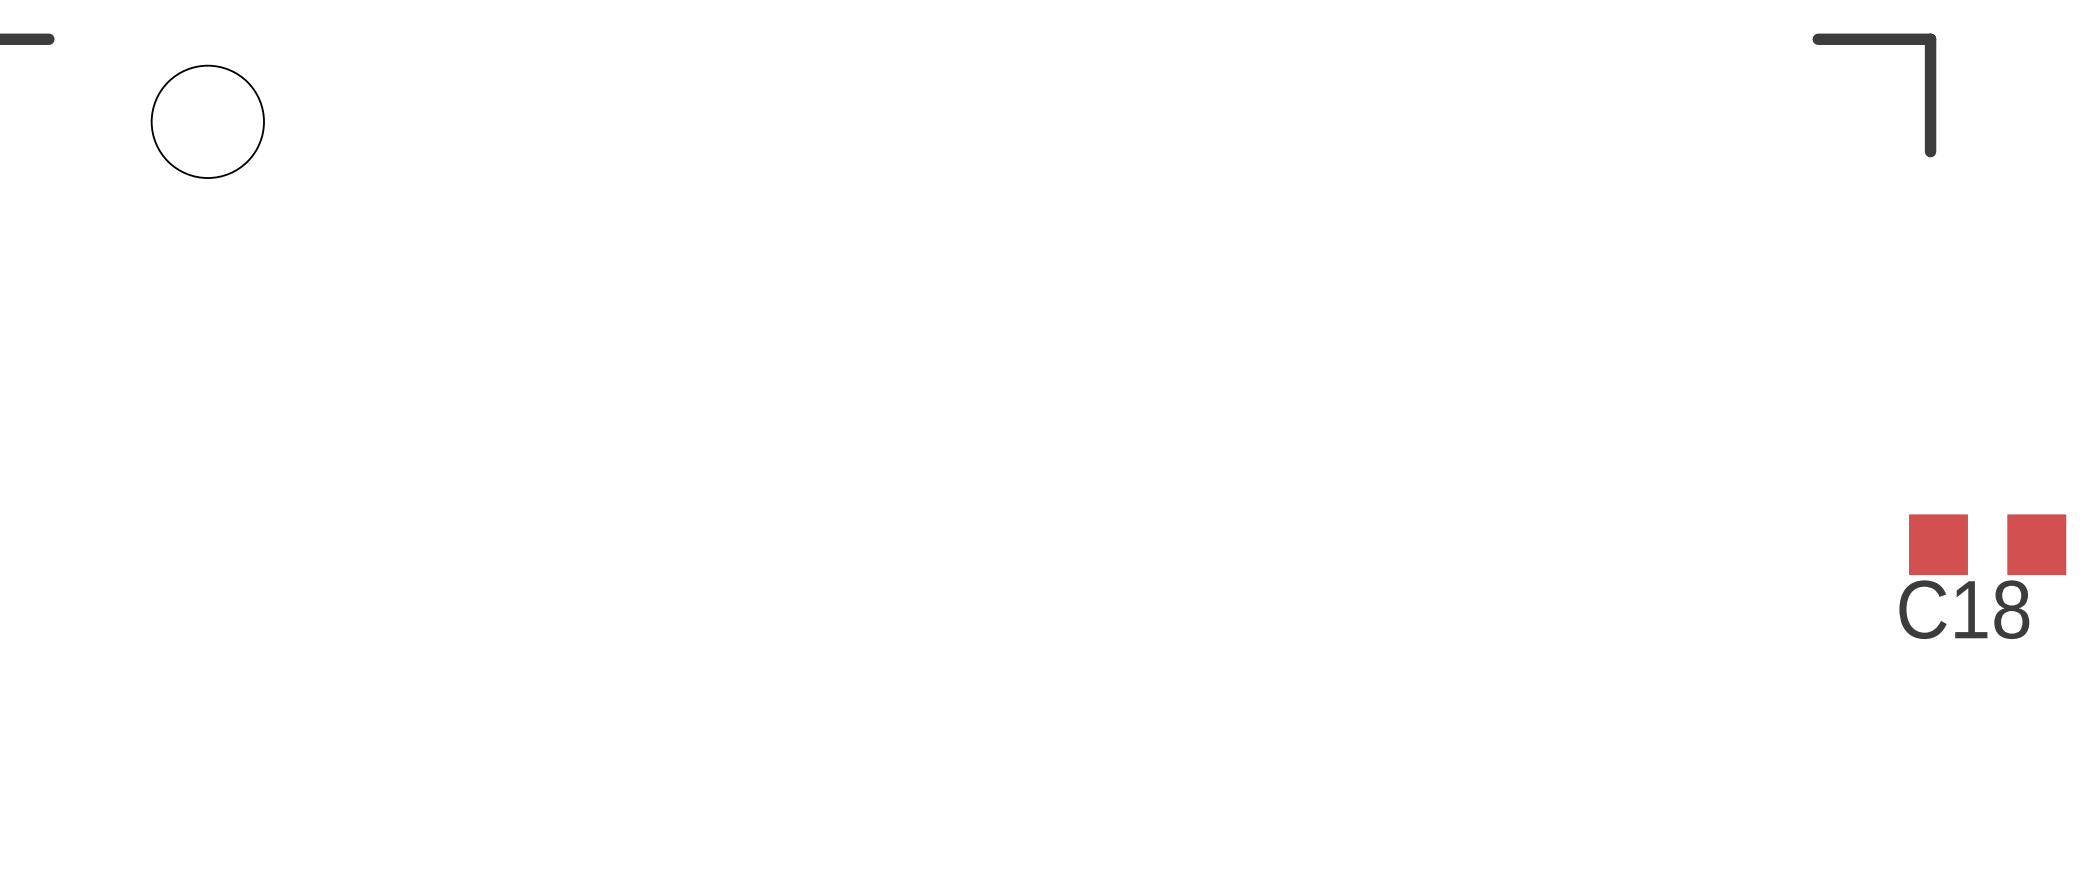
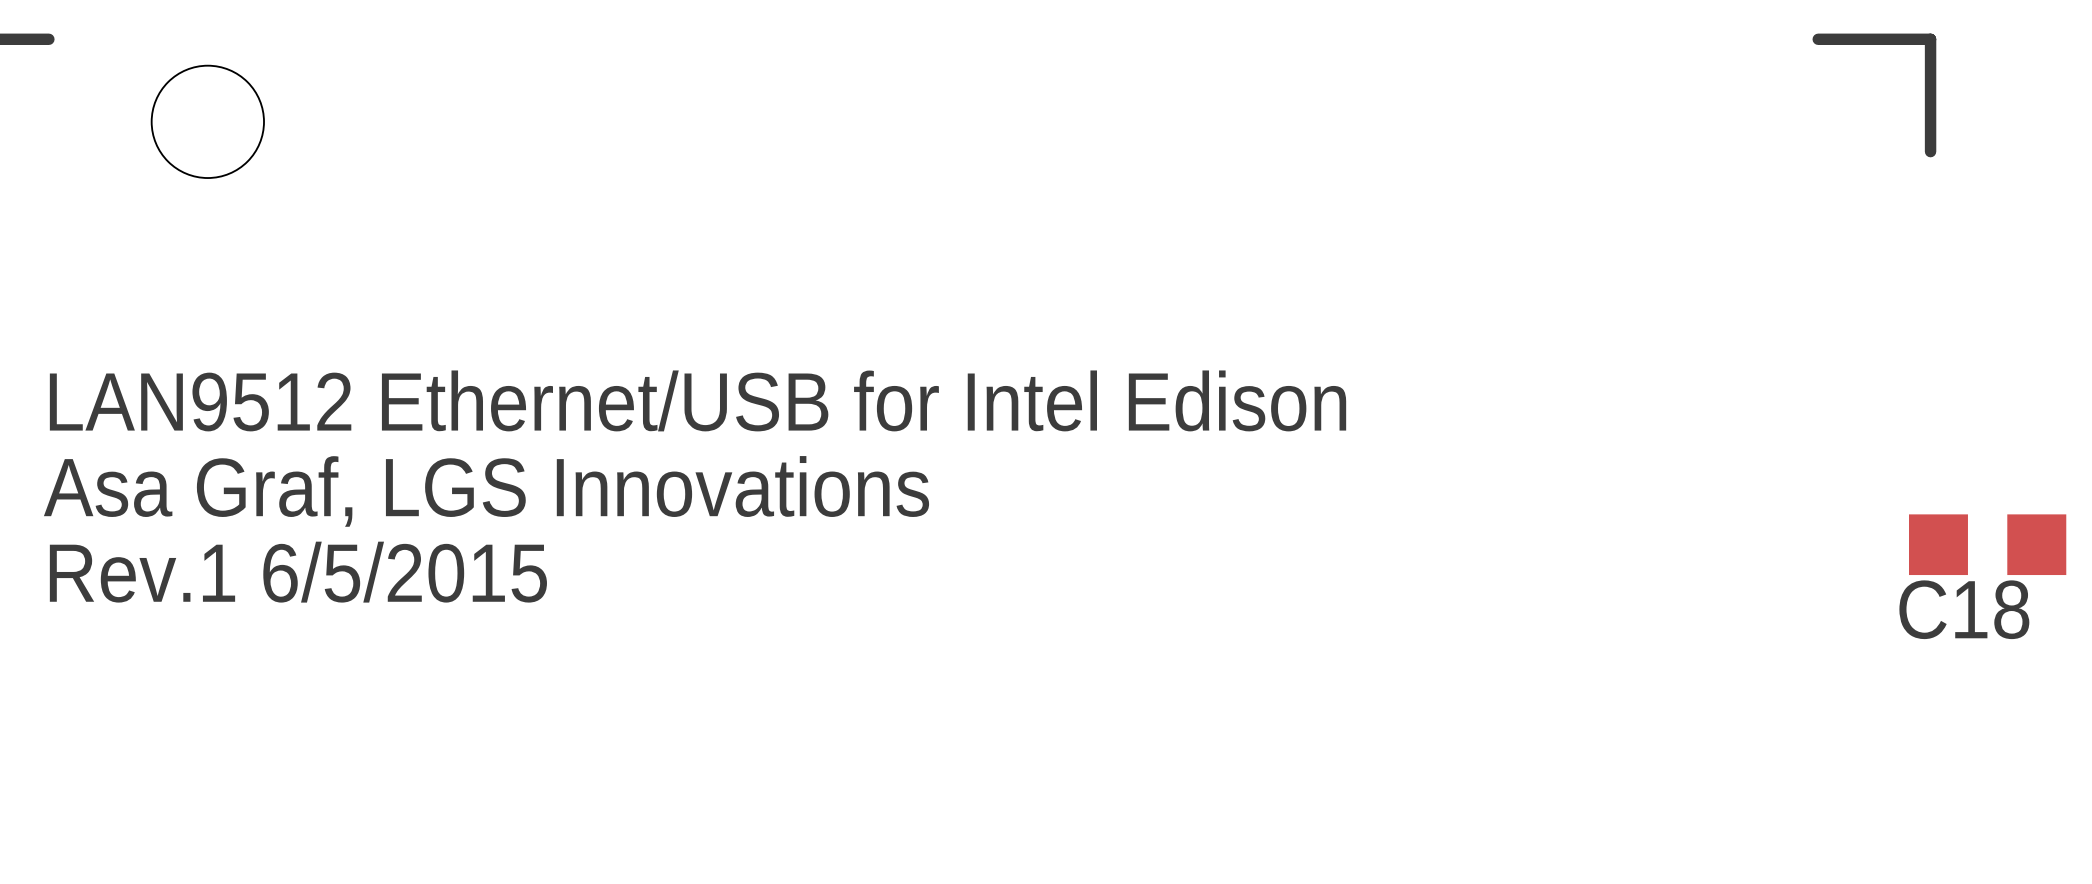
text: none -> LAN9512 Ethernet/USB for Intel Edison (698, 400)
text: none -> Asa Graf, LGS Innovations (486, 491)
text: none -> Rev.1 6/5/2015 (298, 572)

